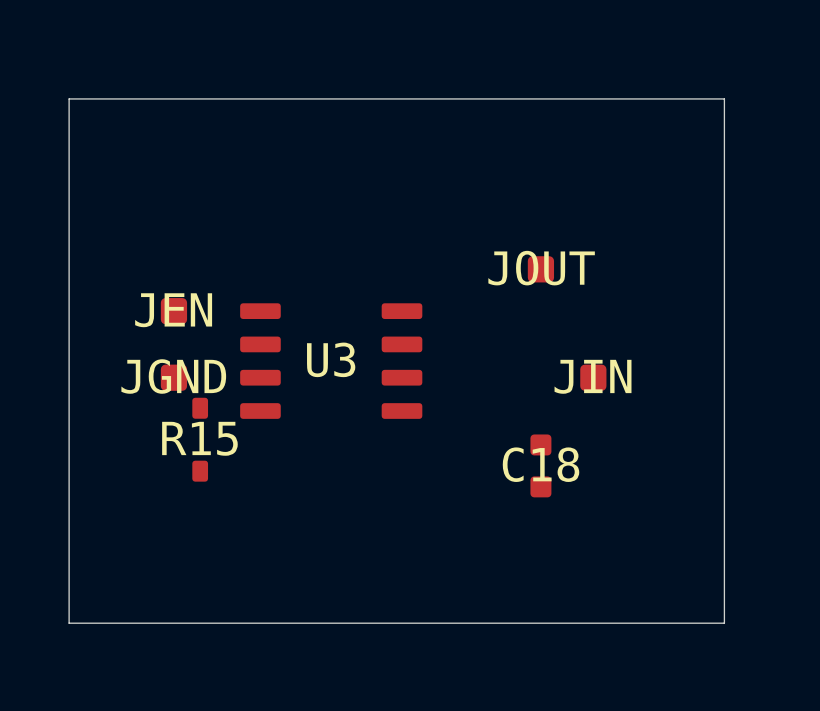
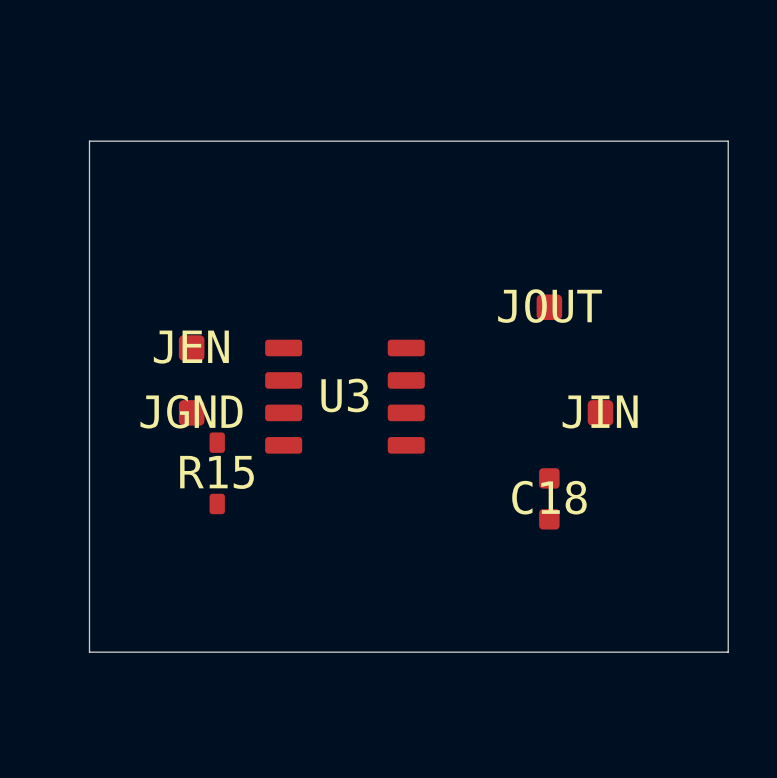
U3 footprint: [240, 303, 423, 419] -> [265, 339, 425, 454]

